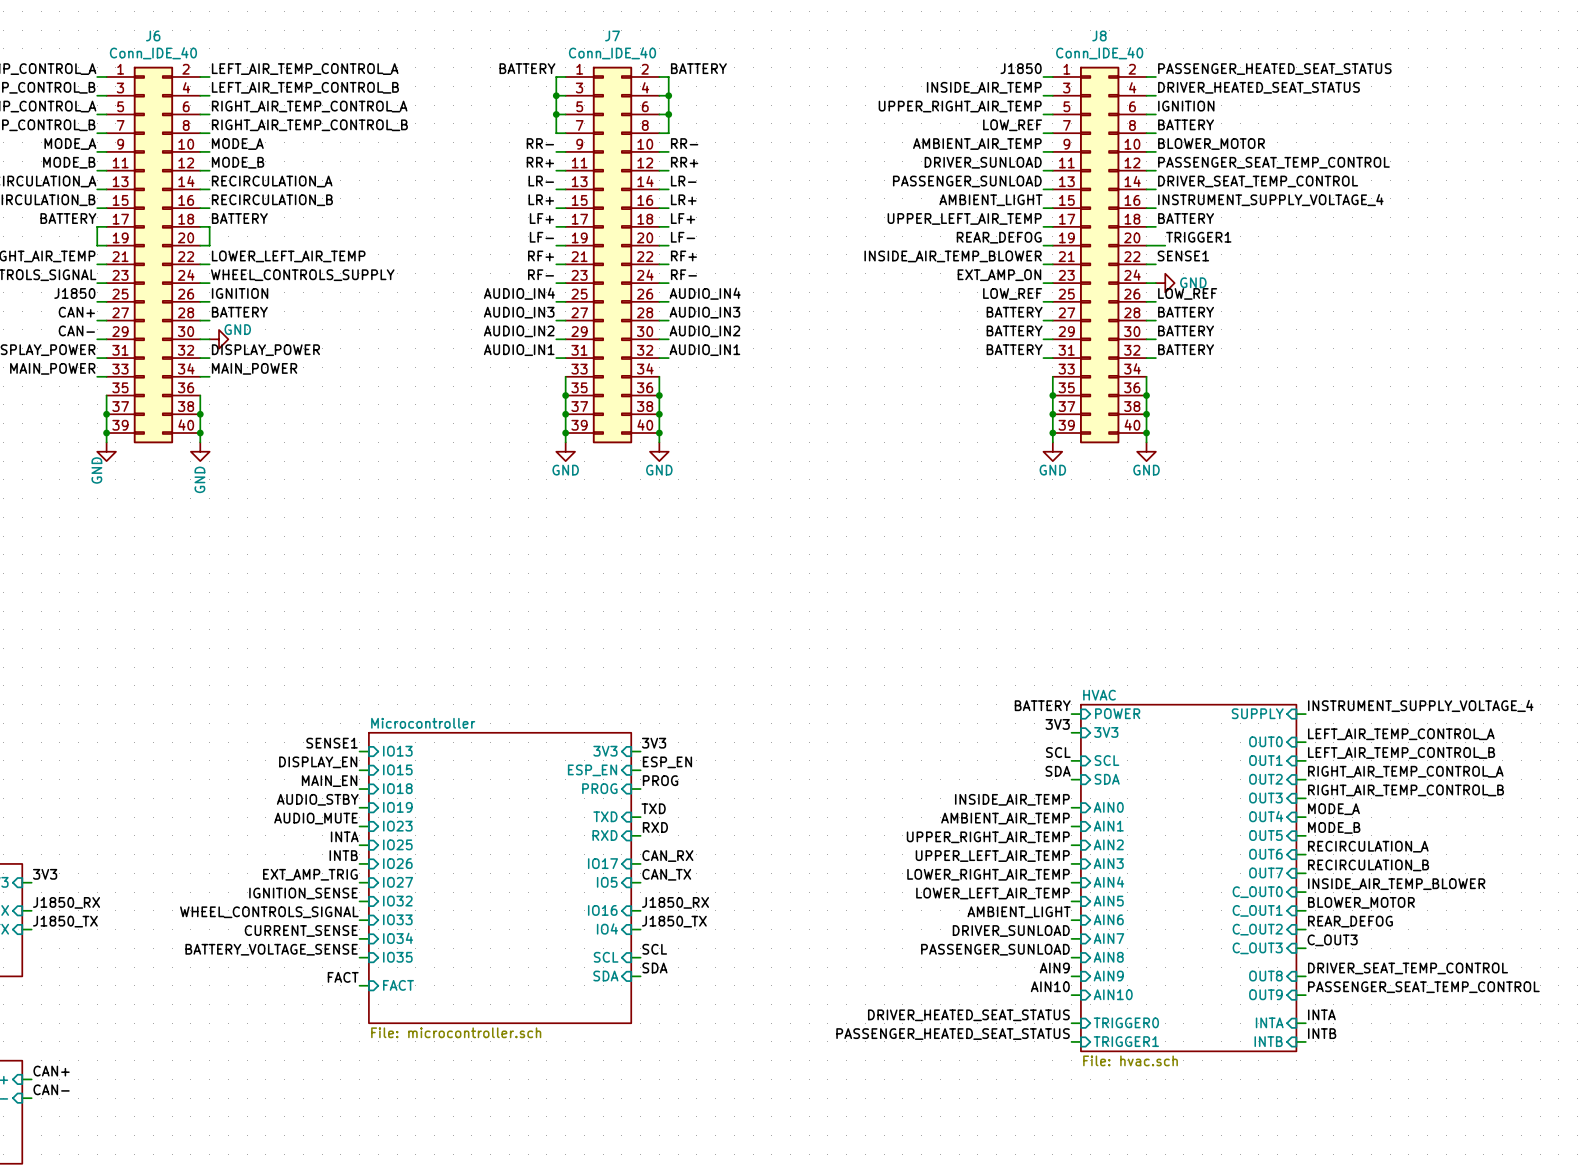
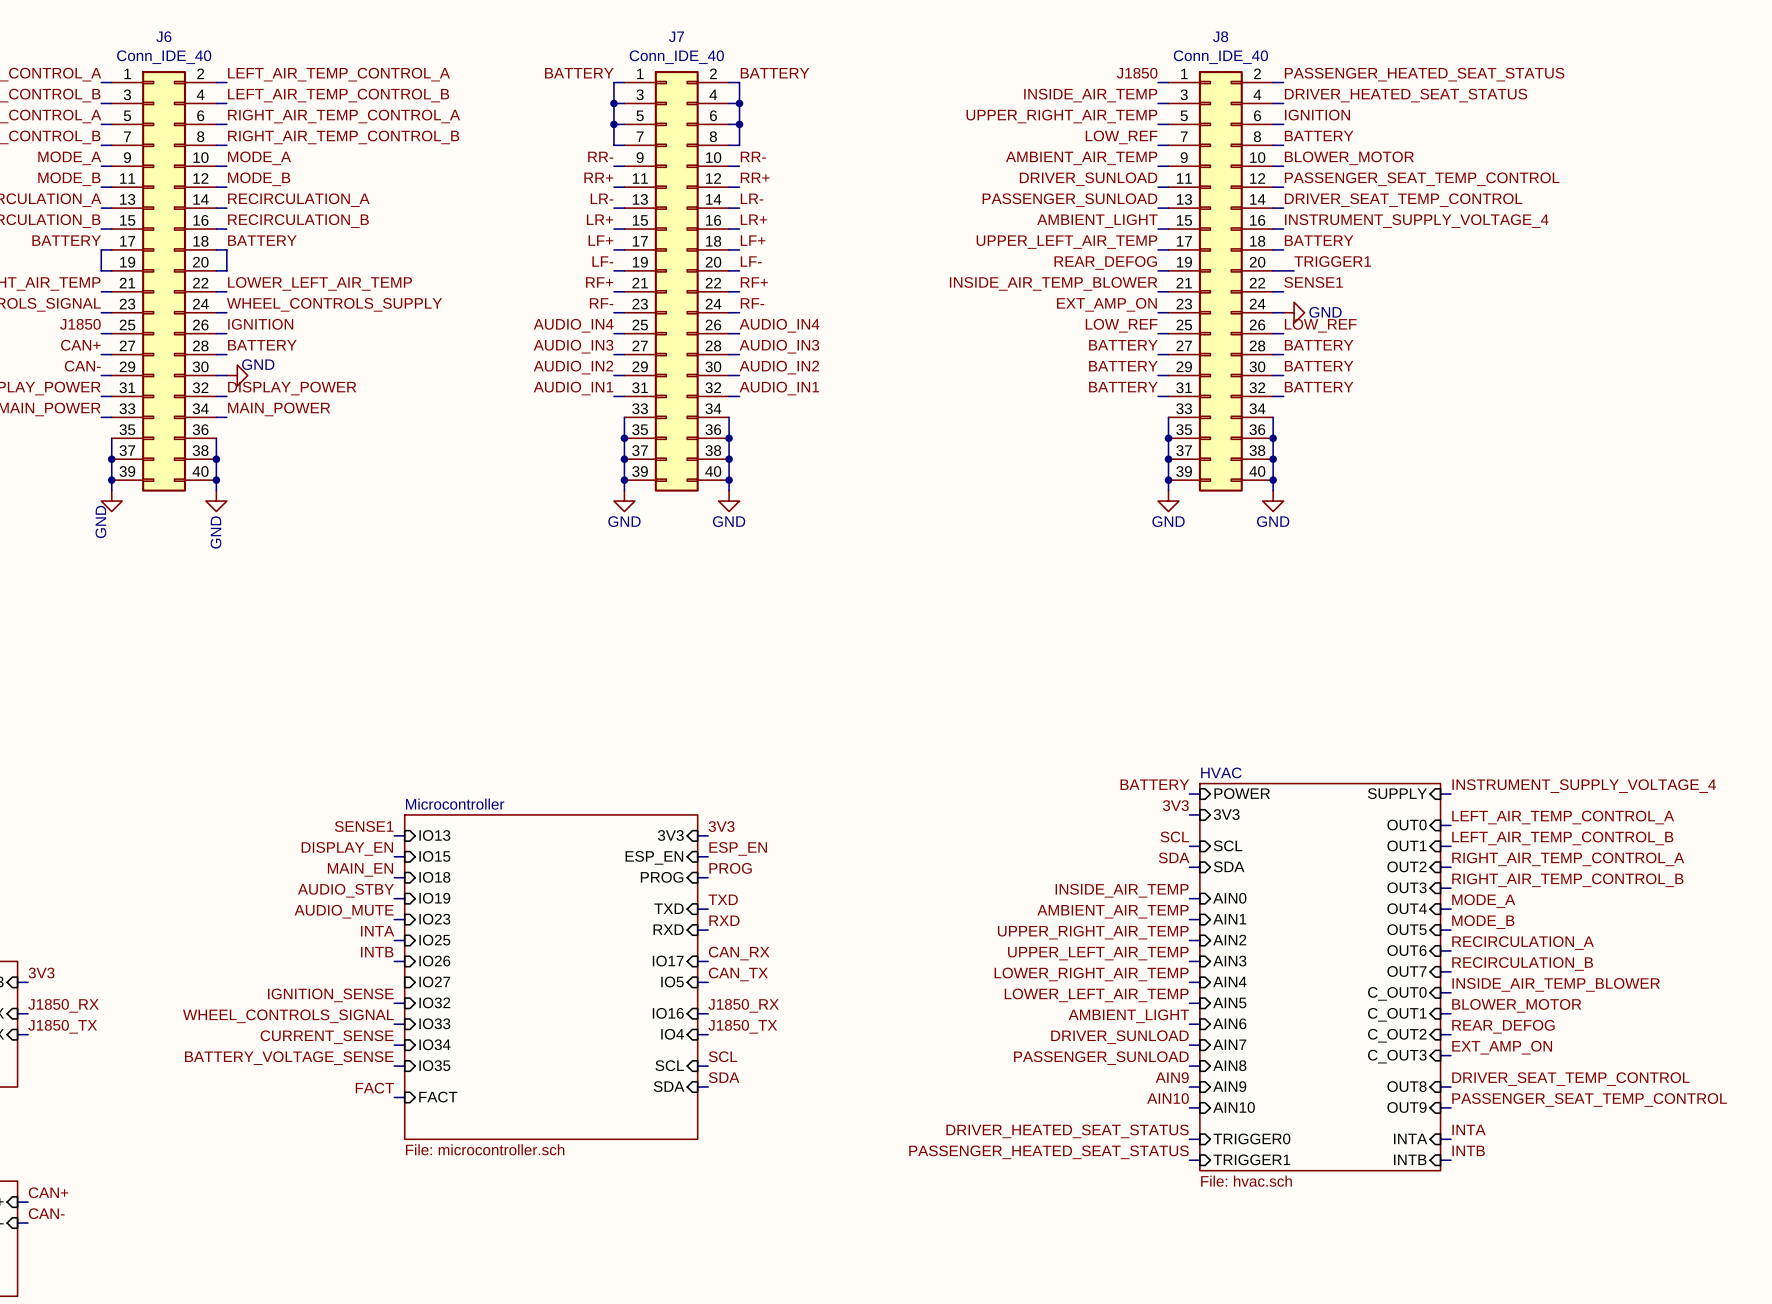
label: EXT_AMP_TRIG (310, 874) -> none
wire: (359, 882) (368, 882) -> none
label: C_OUT3 (1332, 940) -> EXT_AMP_ON (1502, 1047)

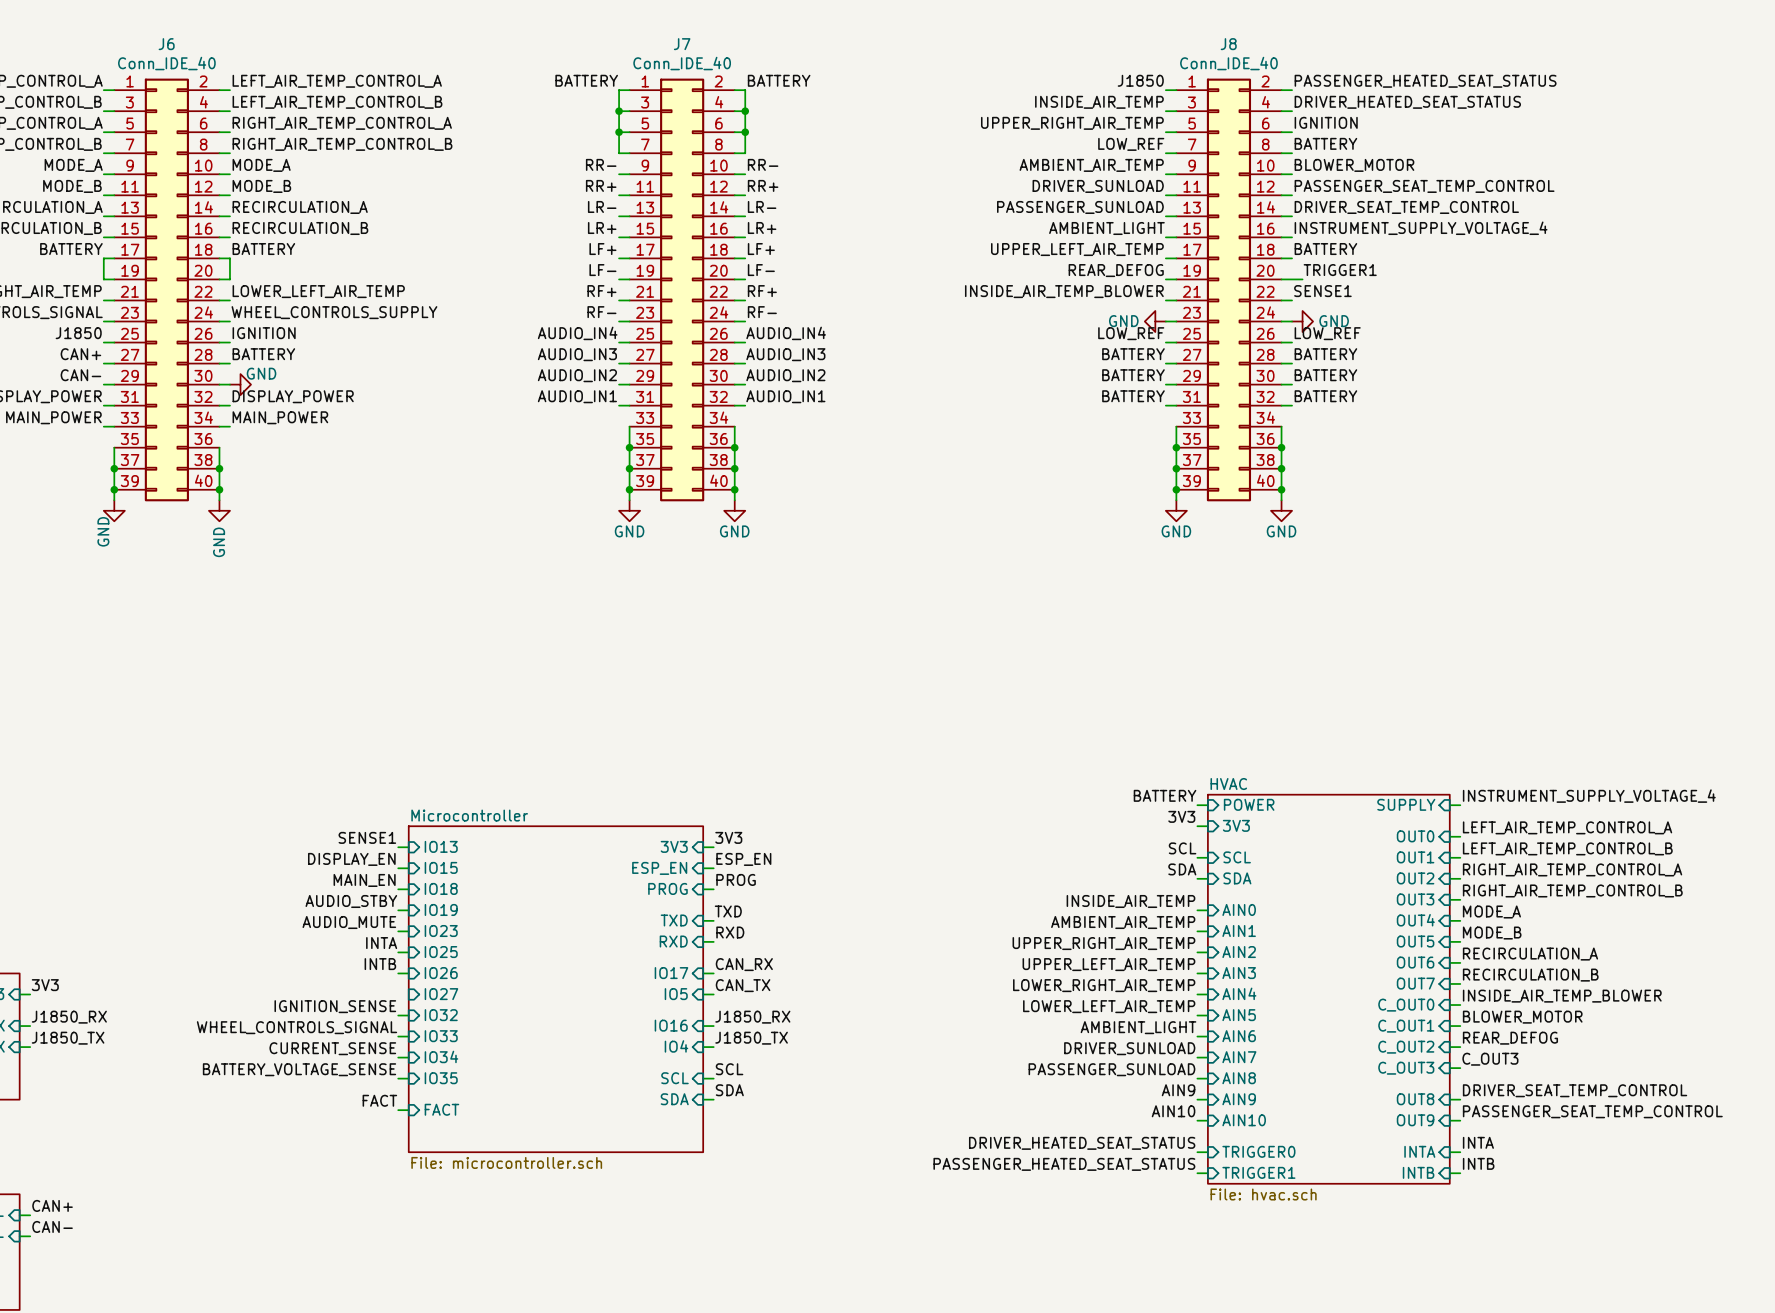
label: EXT_AMP_ON (1106, 304) -> none
power symbol: none -> GND (1155, 321)
label: EXT_AMP_ON (1502, 1047) -> C_OUT3 (1490, 1059)

